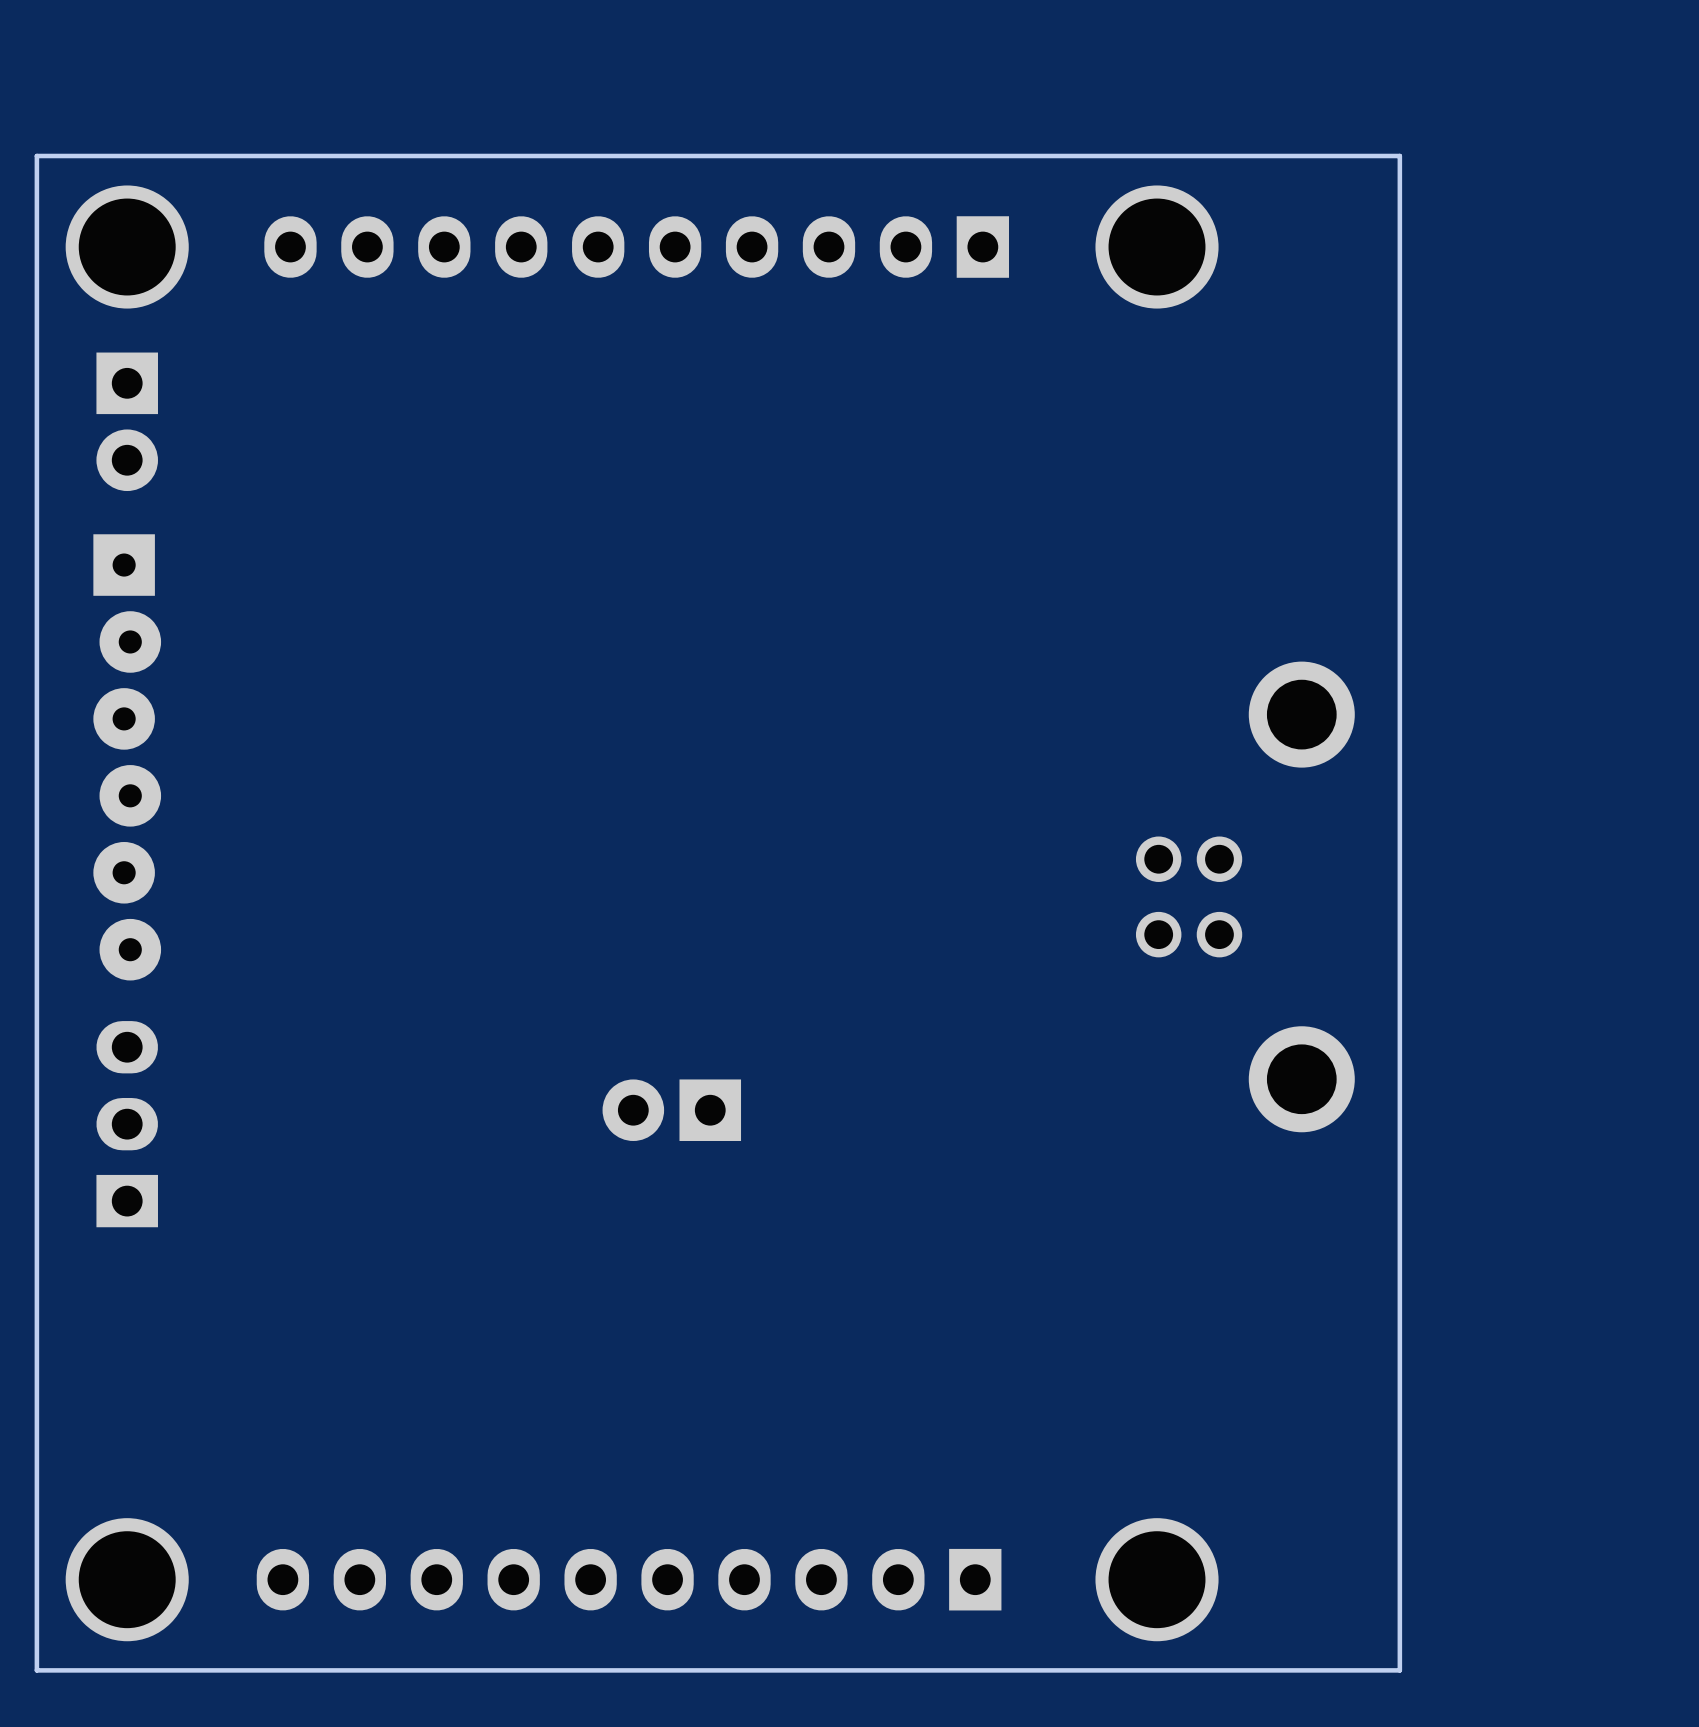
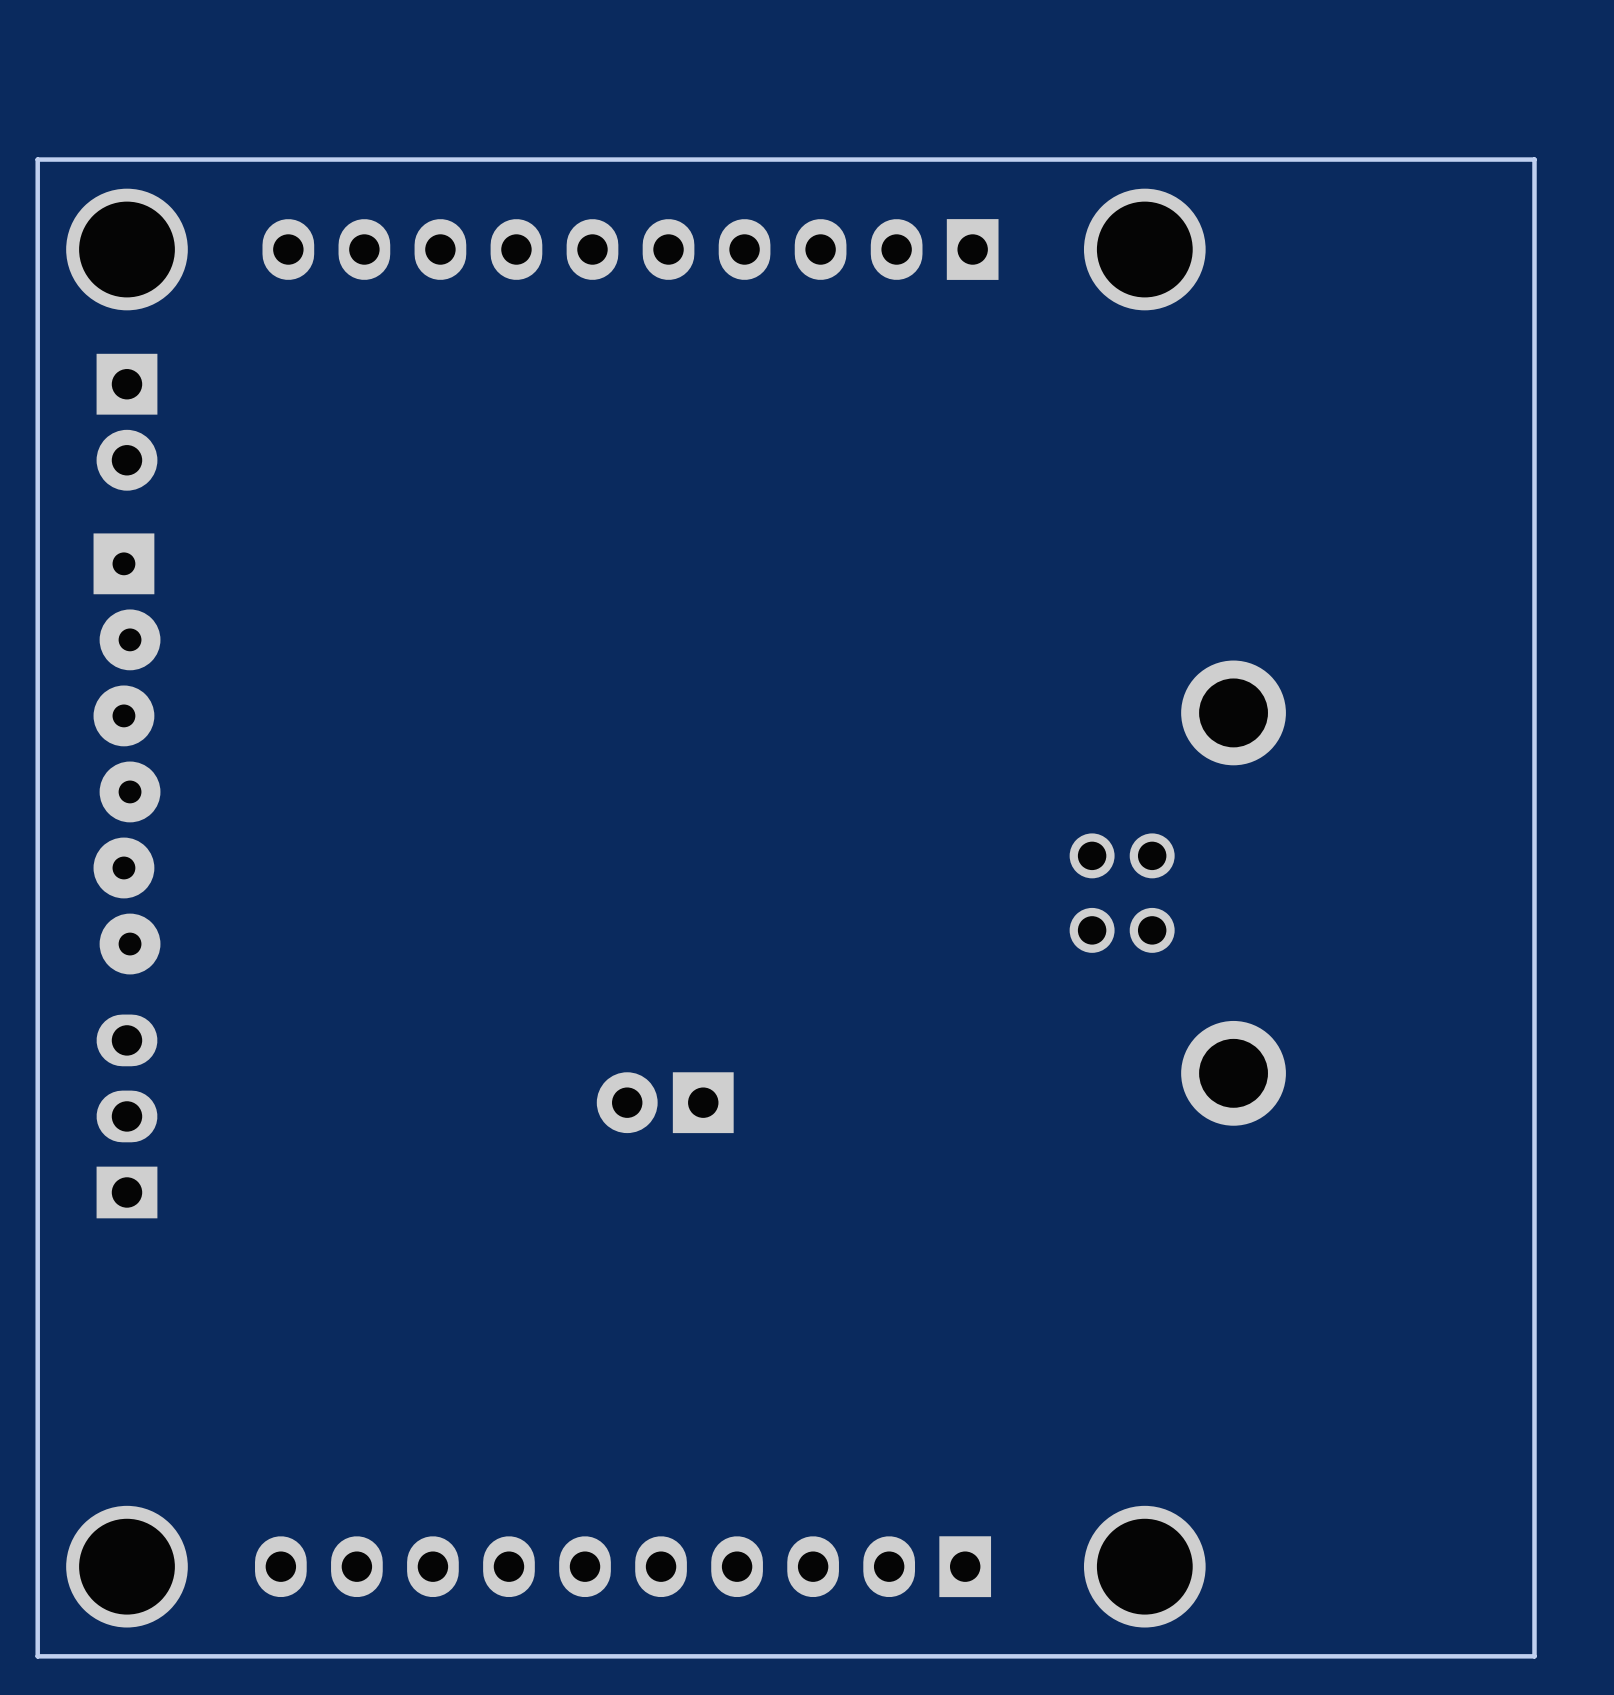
board edge: (1399, 156) (1399, 1670) -> (1384, 159) (1534, 159) (1534, 1656) (1384, 1656)
part position: (1245, 896) -> (1177, 893)

